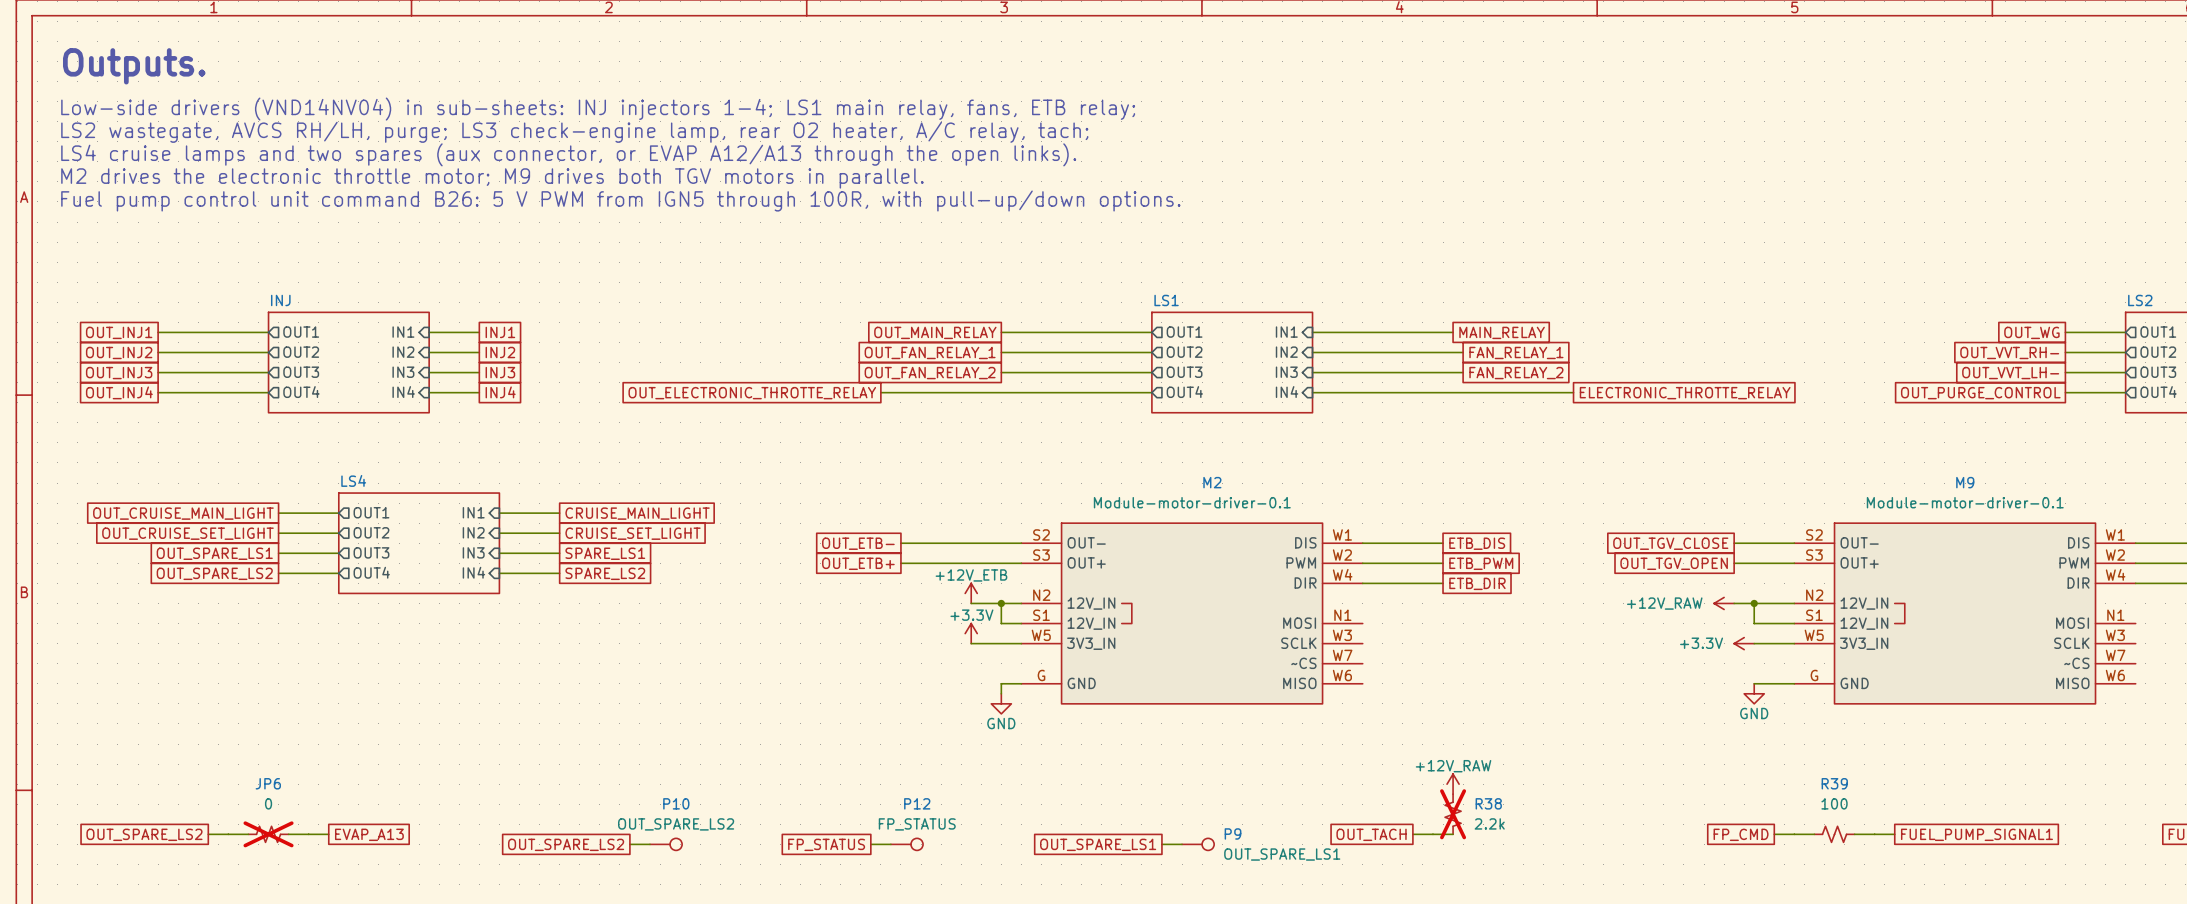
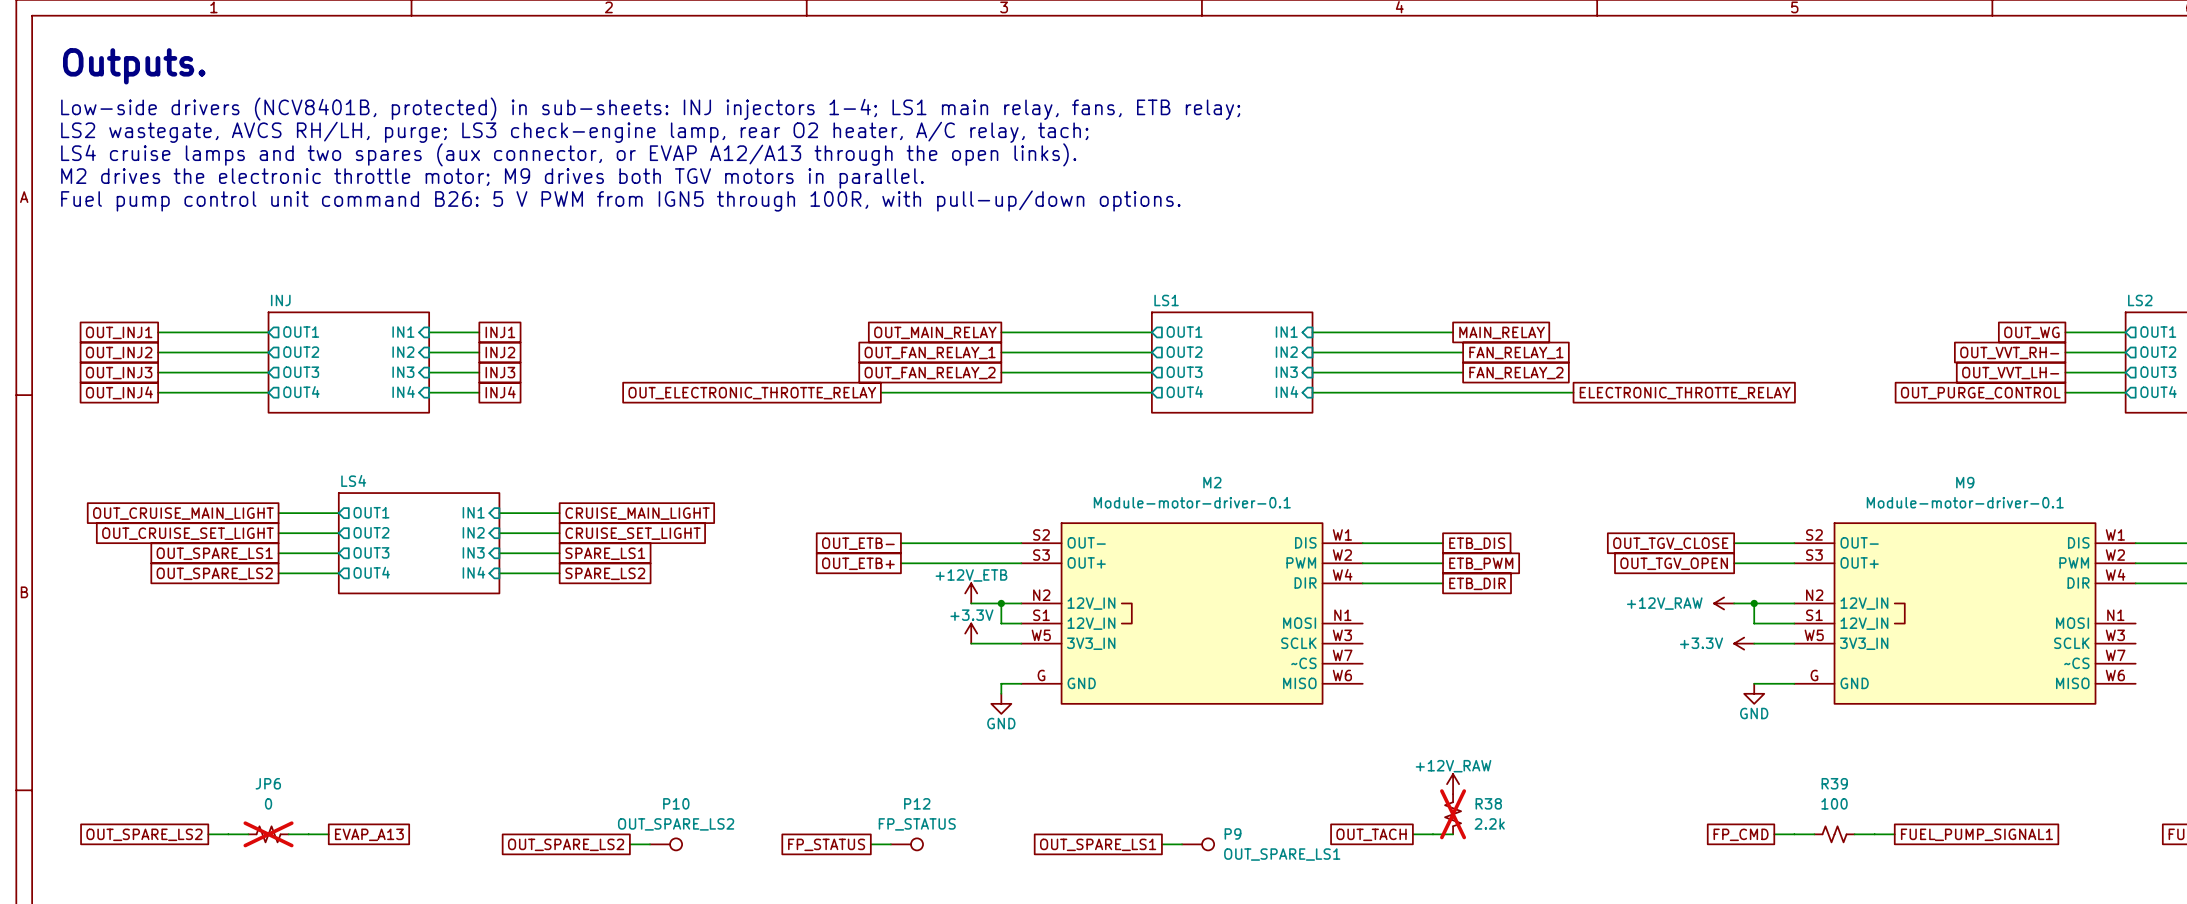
text: Low-side drivers (VND14NV04) in sub-sheets: INJ injectors 1-4; LS1 main relay, fans, ETB relay; (598, 109) -> Low-side drivers (NCV8401B, protected) in sub-sheets: INJ injectors 1-4; LS1 main relay, fans, ETB relay; (650, 109)

